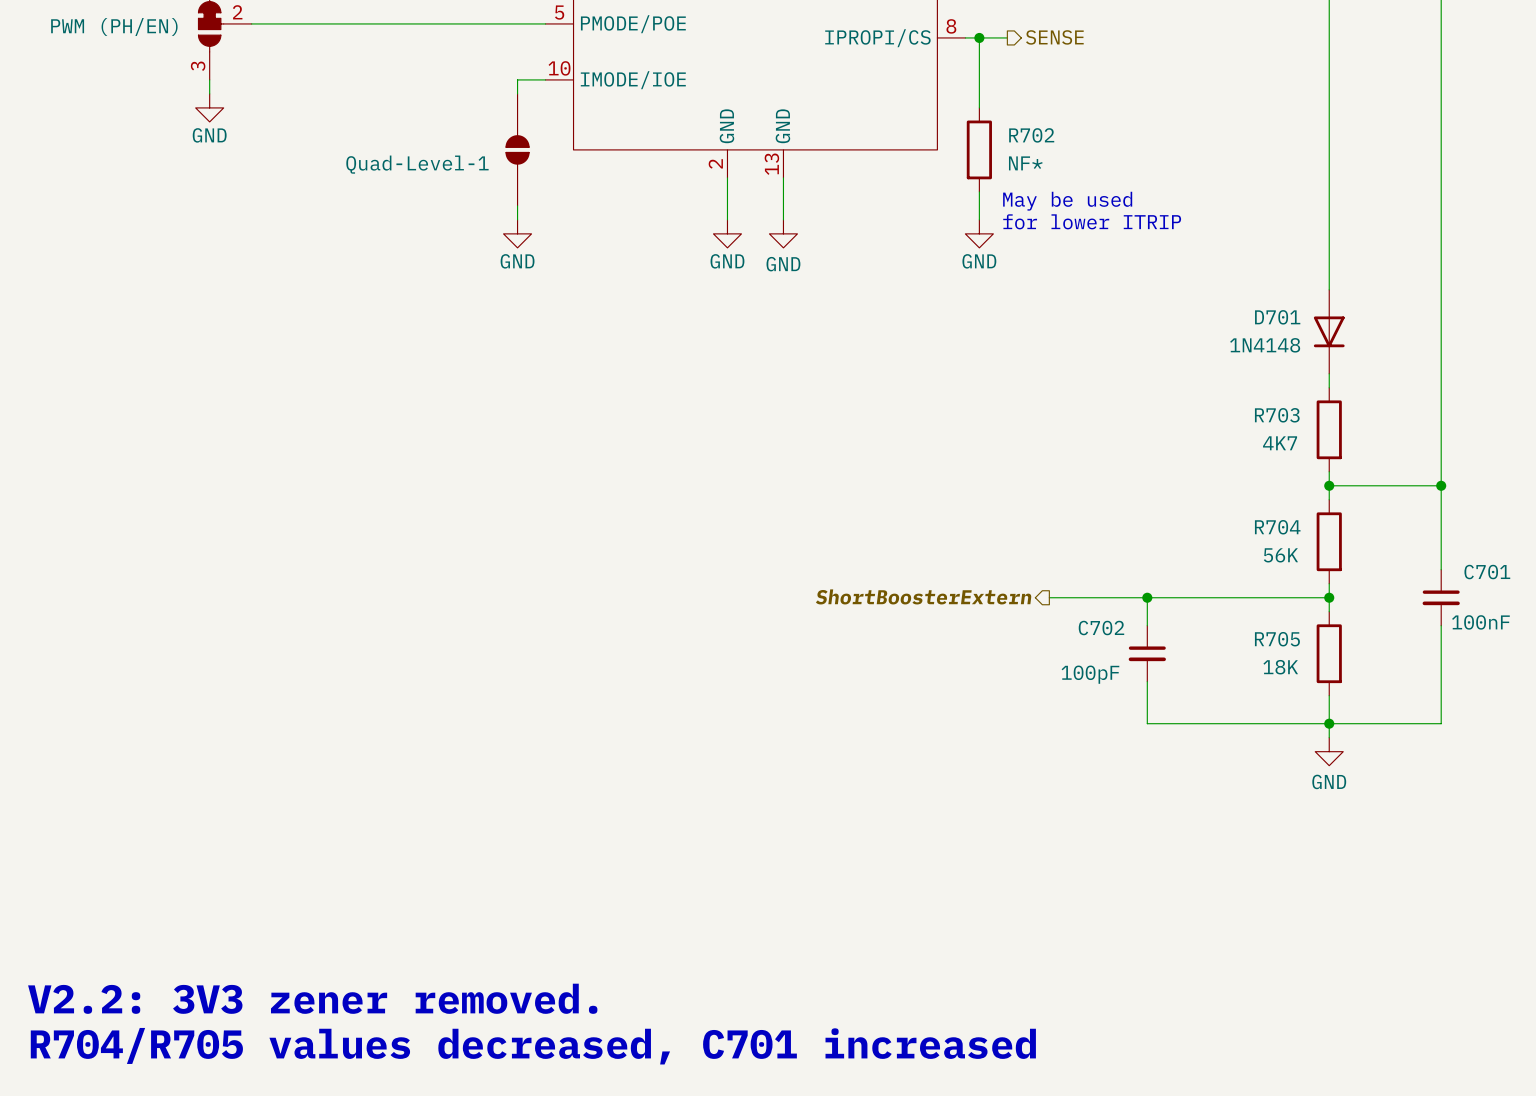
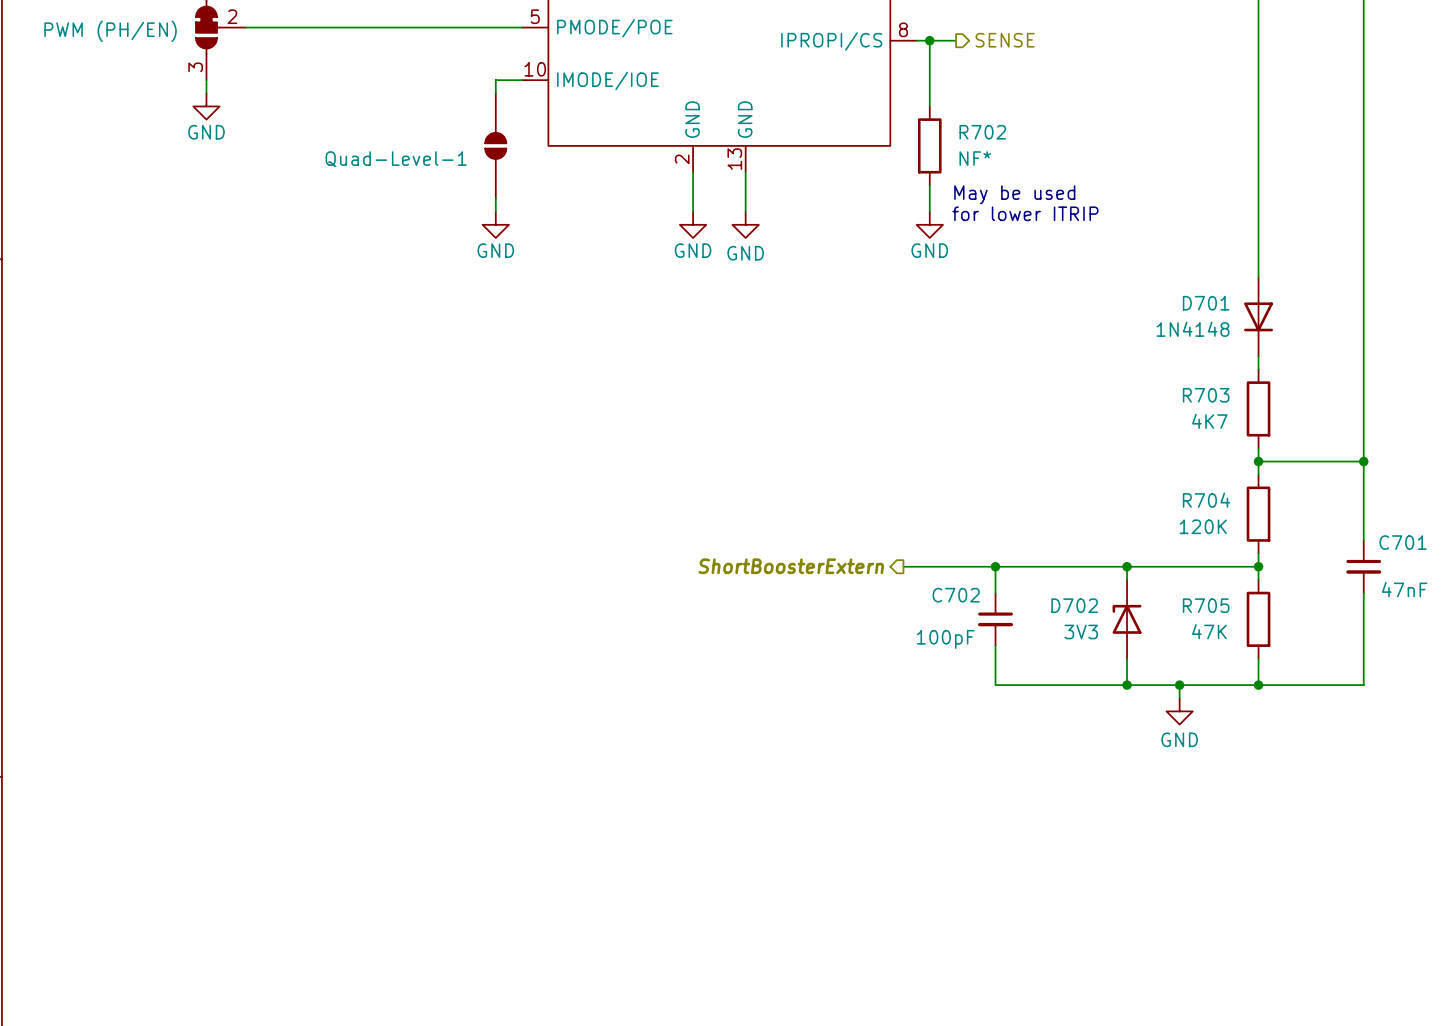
R704 value: 56K (1280, 555) -> 120K (1203, 526)
hierarchical label position: ShortBoosterExtern (923, 596) -> ShortBoosterExtern (791, 566)
wire: none -> (903, 566) (995, 566) (995, 593)
junction: none -> (995, 566)
wire: (1147, 597) (1147, 625) -> (1127, 658) (1127, 685)
junction position: (1147, 597) -> (1127, 566)
wire: none -> (1127, 566) (1127, 579)
C701 value: 100nF (1480, 622) -> 47nF (1404, 589)
C702 position: (1147, 653) -> (995, 619)
D702: none -> 3V3 (1127, 619)
R705 value: 18K (1280, 667) -> 47K (1209, 631)
wire: (1147, 681) (1147, 723) -> (995, 645) (995, 685) (1087, 685)
junction: none -> (1127, 685)
junction: none -> (1179, 685)
wire: (1329, 723) (1329, 737) -> (1179, 685) (1179, 698)
power symbol position: GND (1329, 751) -> GND (1179, 711)
text: V2.2: 3V3 zener removed. (312, 998) -> none
text: R704/R705 values decreased, C701 increased (533, 1046) -> none

